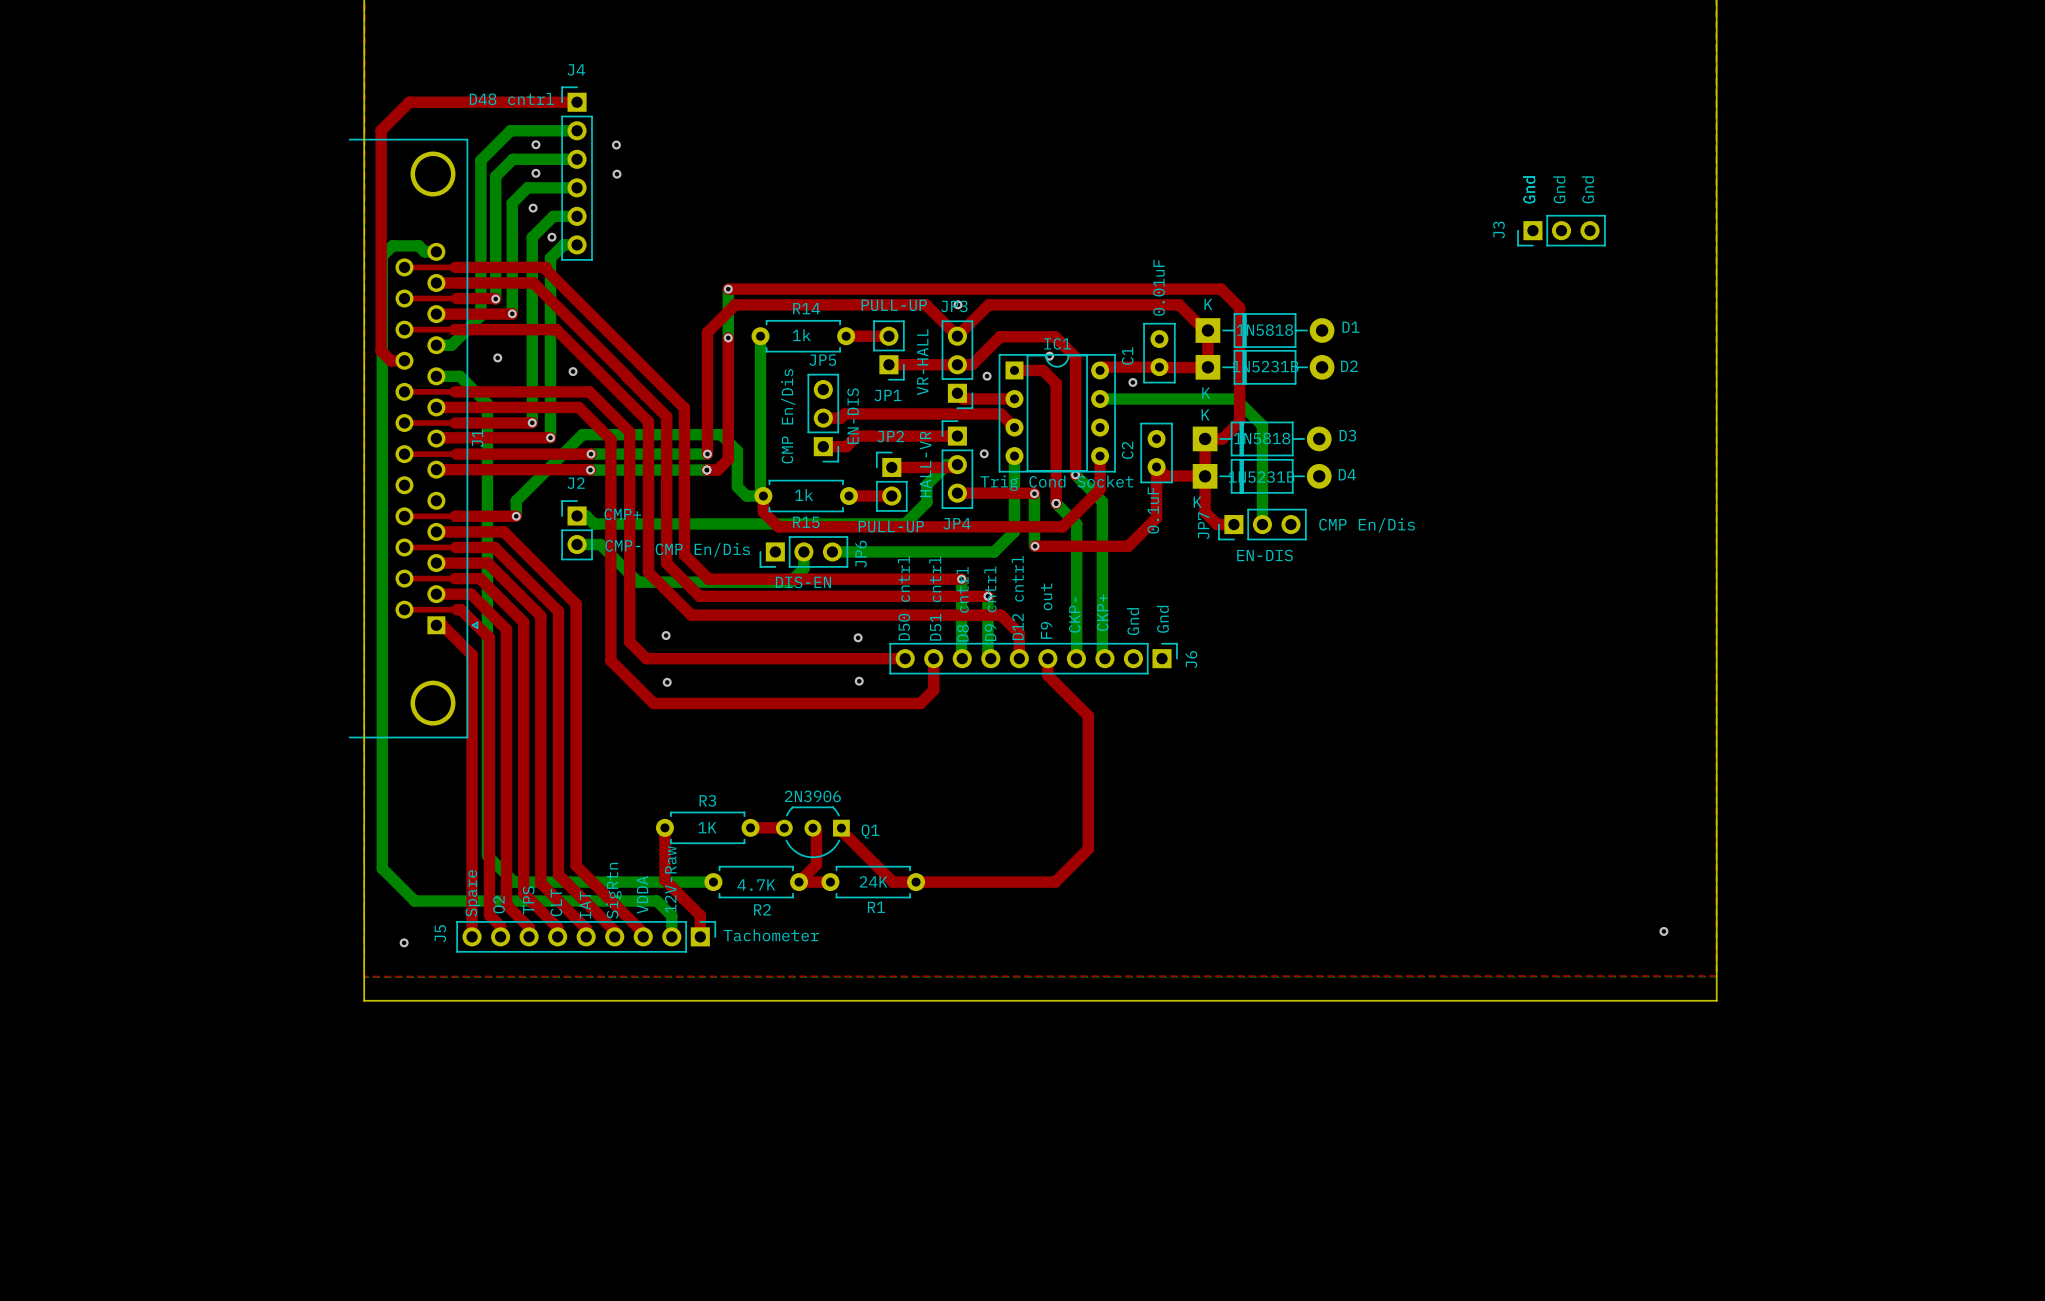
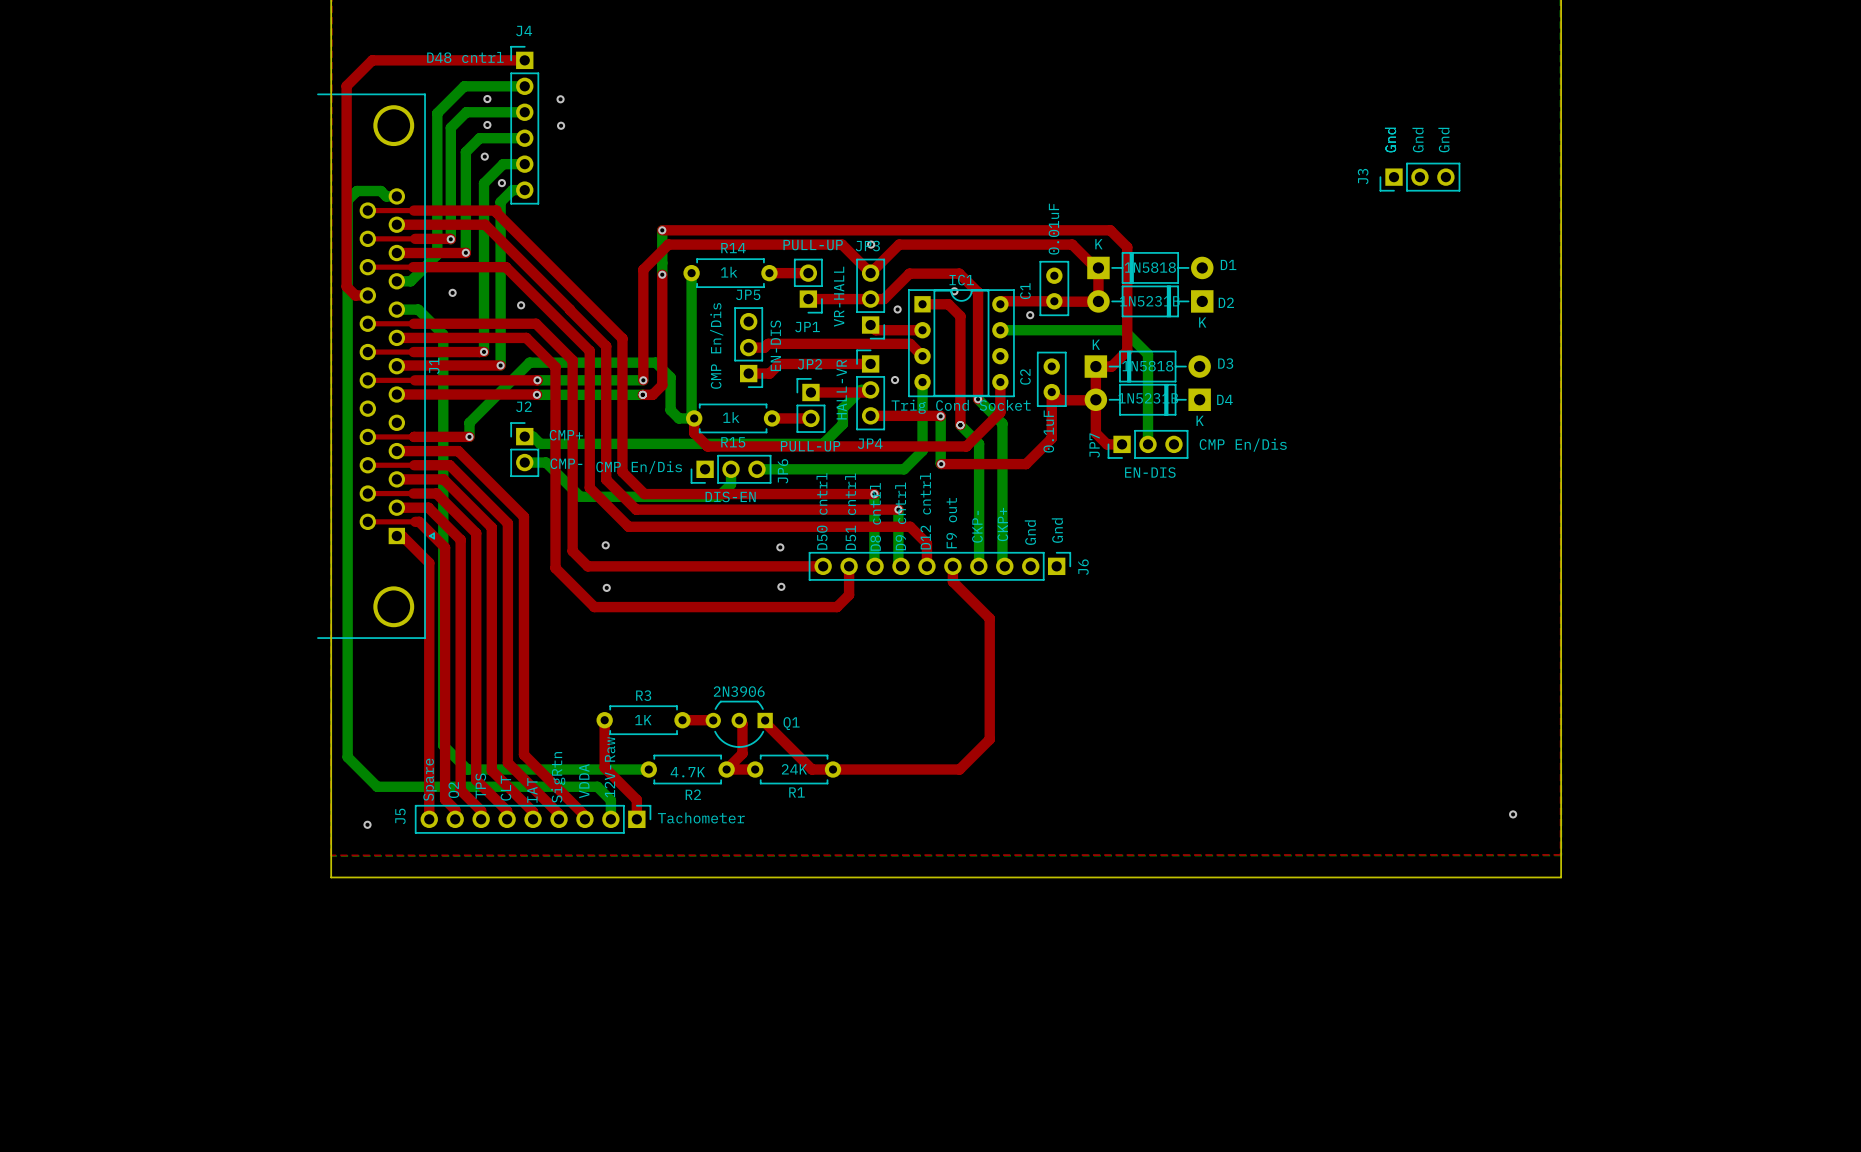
D2 footprint: [1195, 350, 1335, 385] -> [1087, 285, 1214, 318]
D4 footprint: [1192, 459, 1332, 494] -> [1084, 384, 1211, 416]

